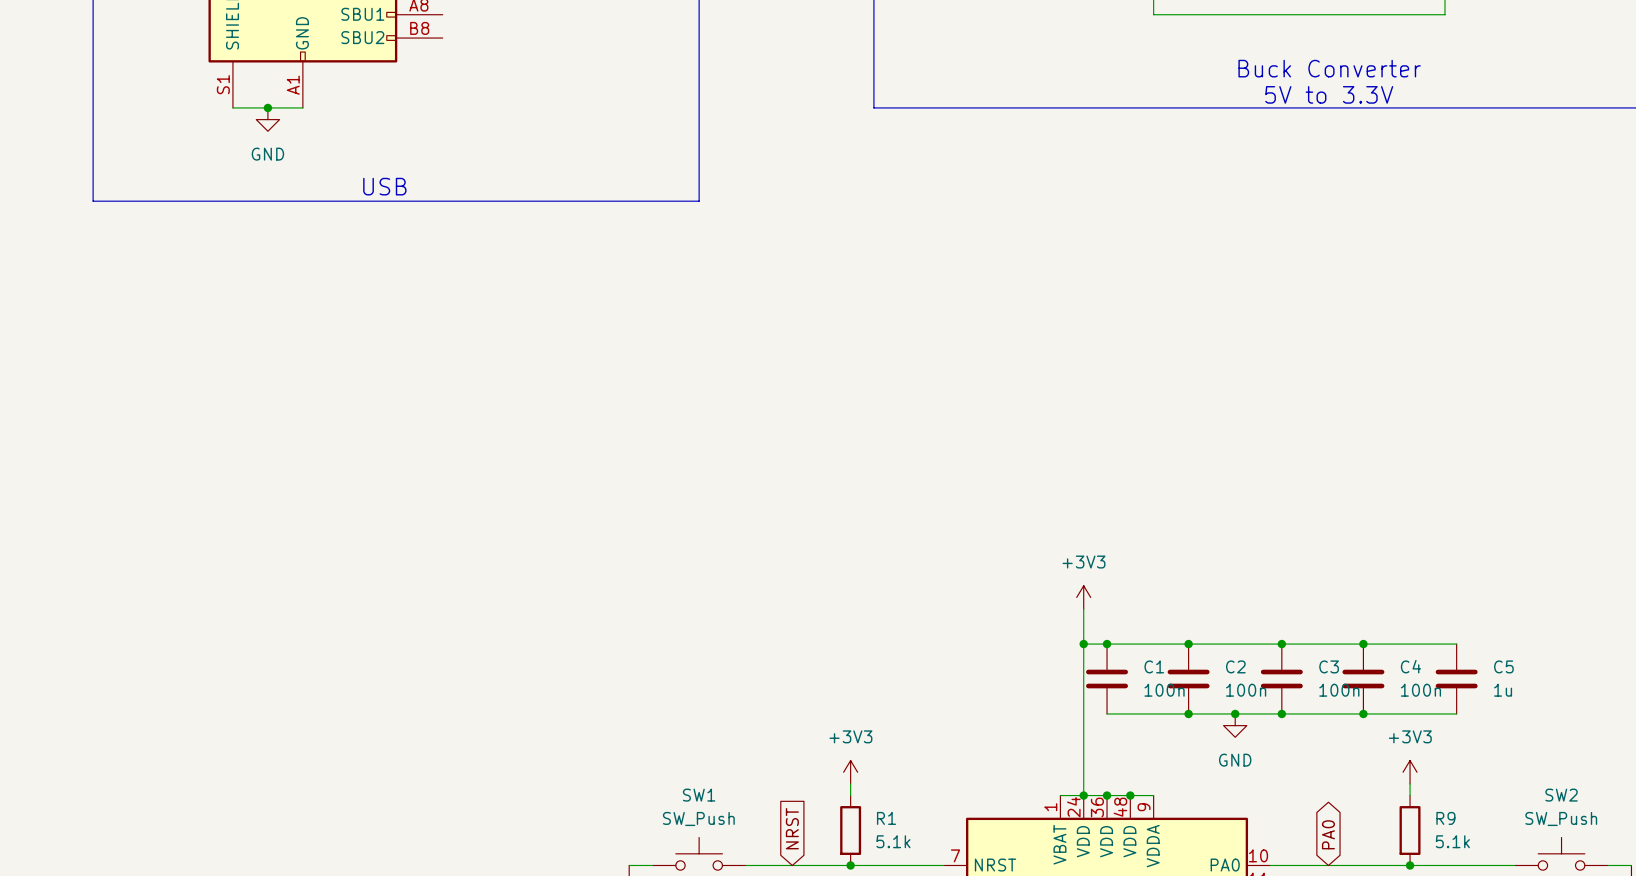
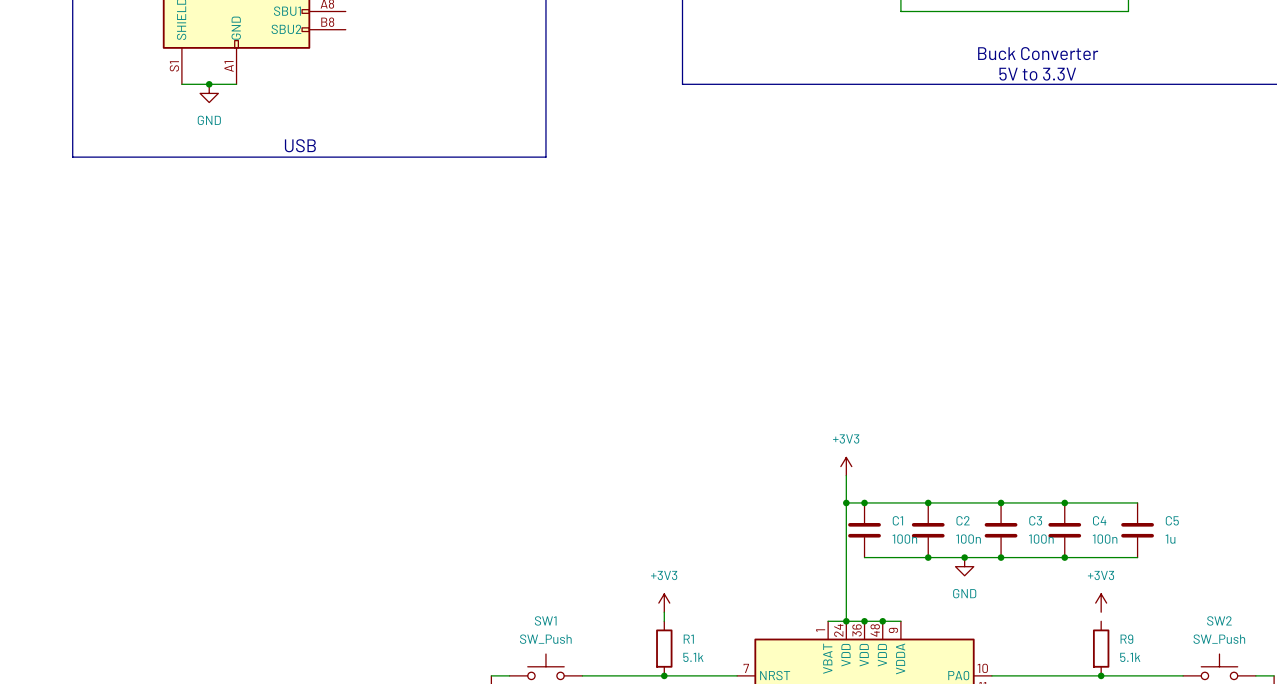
wire: (1410, 783) (1410, 795) -> none
global label: NRST (792, 828) -> none
global label: PA0 (1328, 834) -> none

